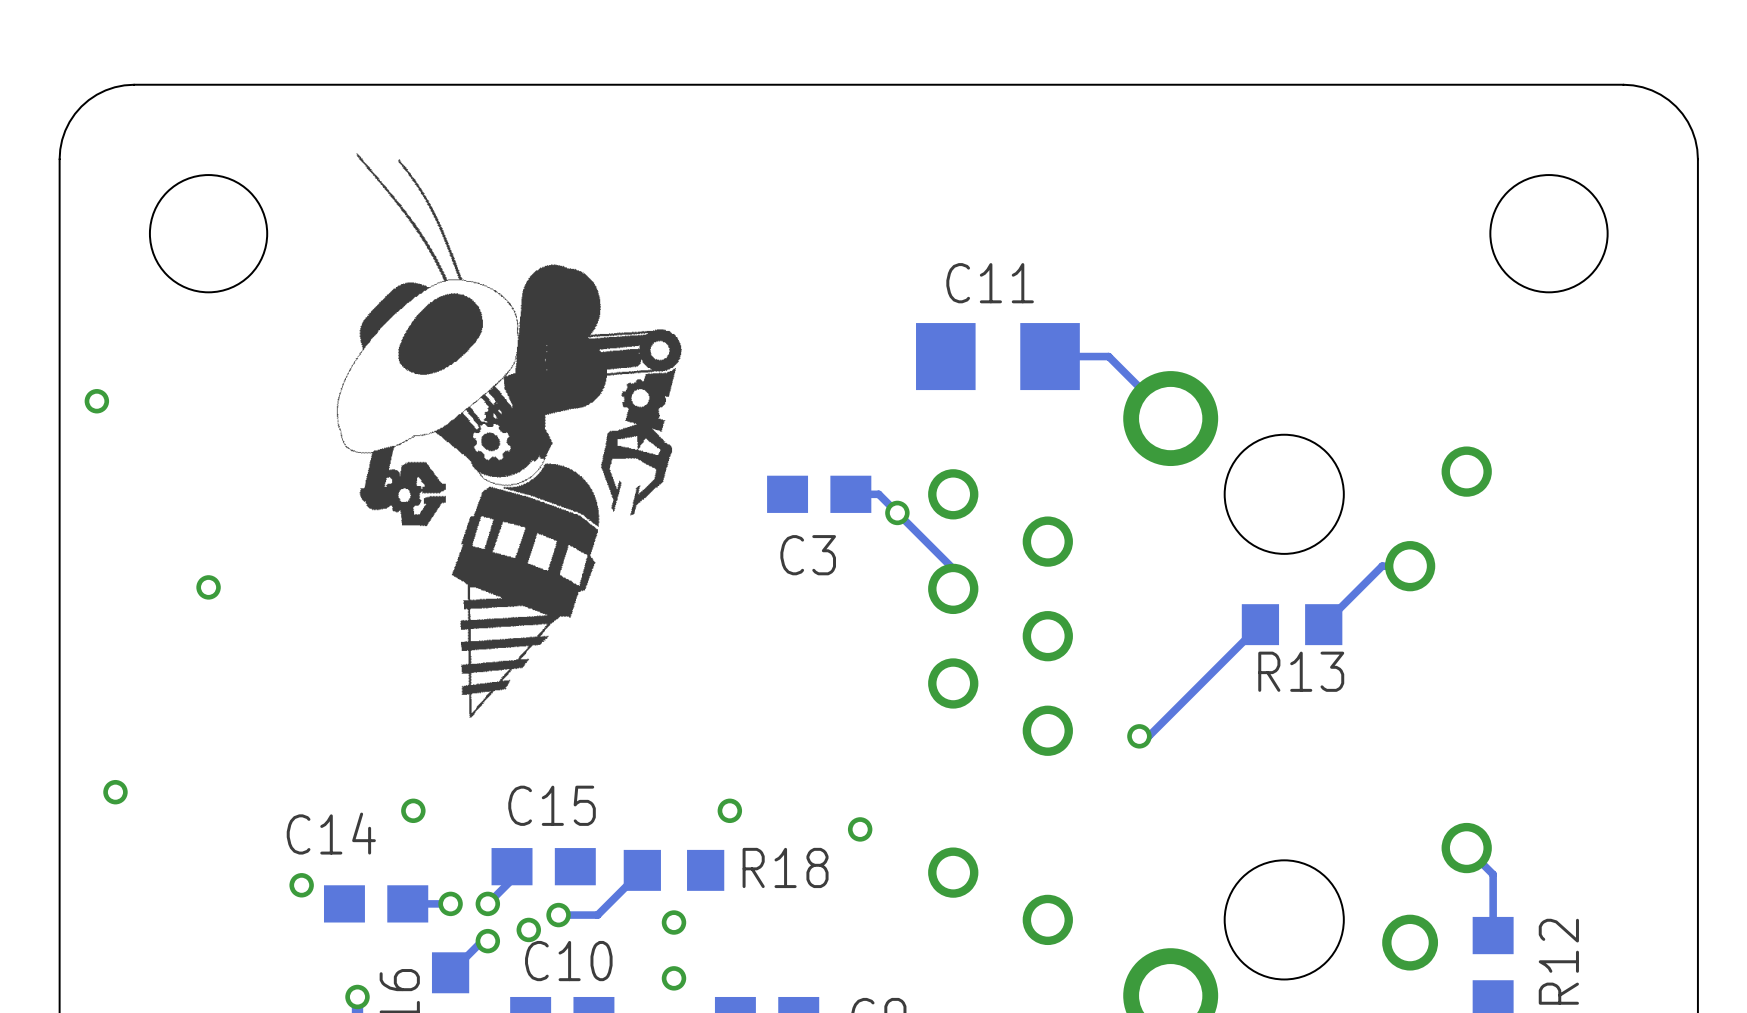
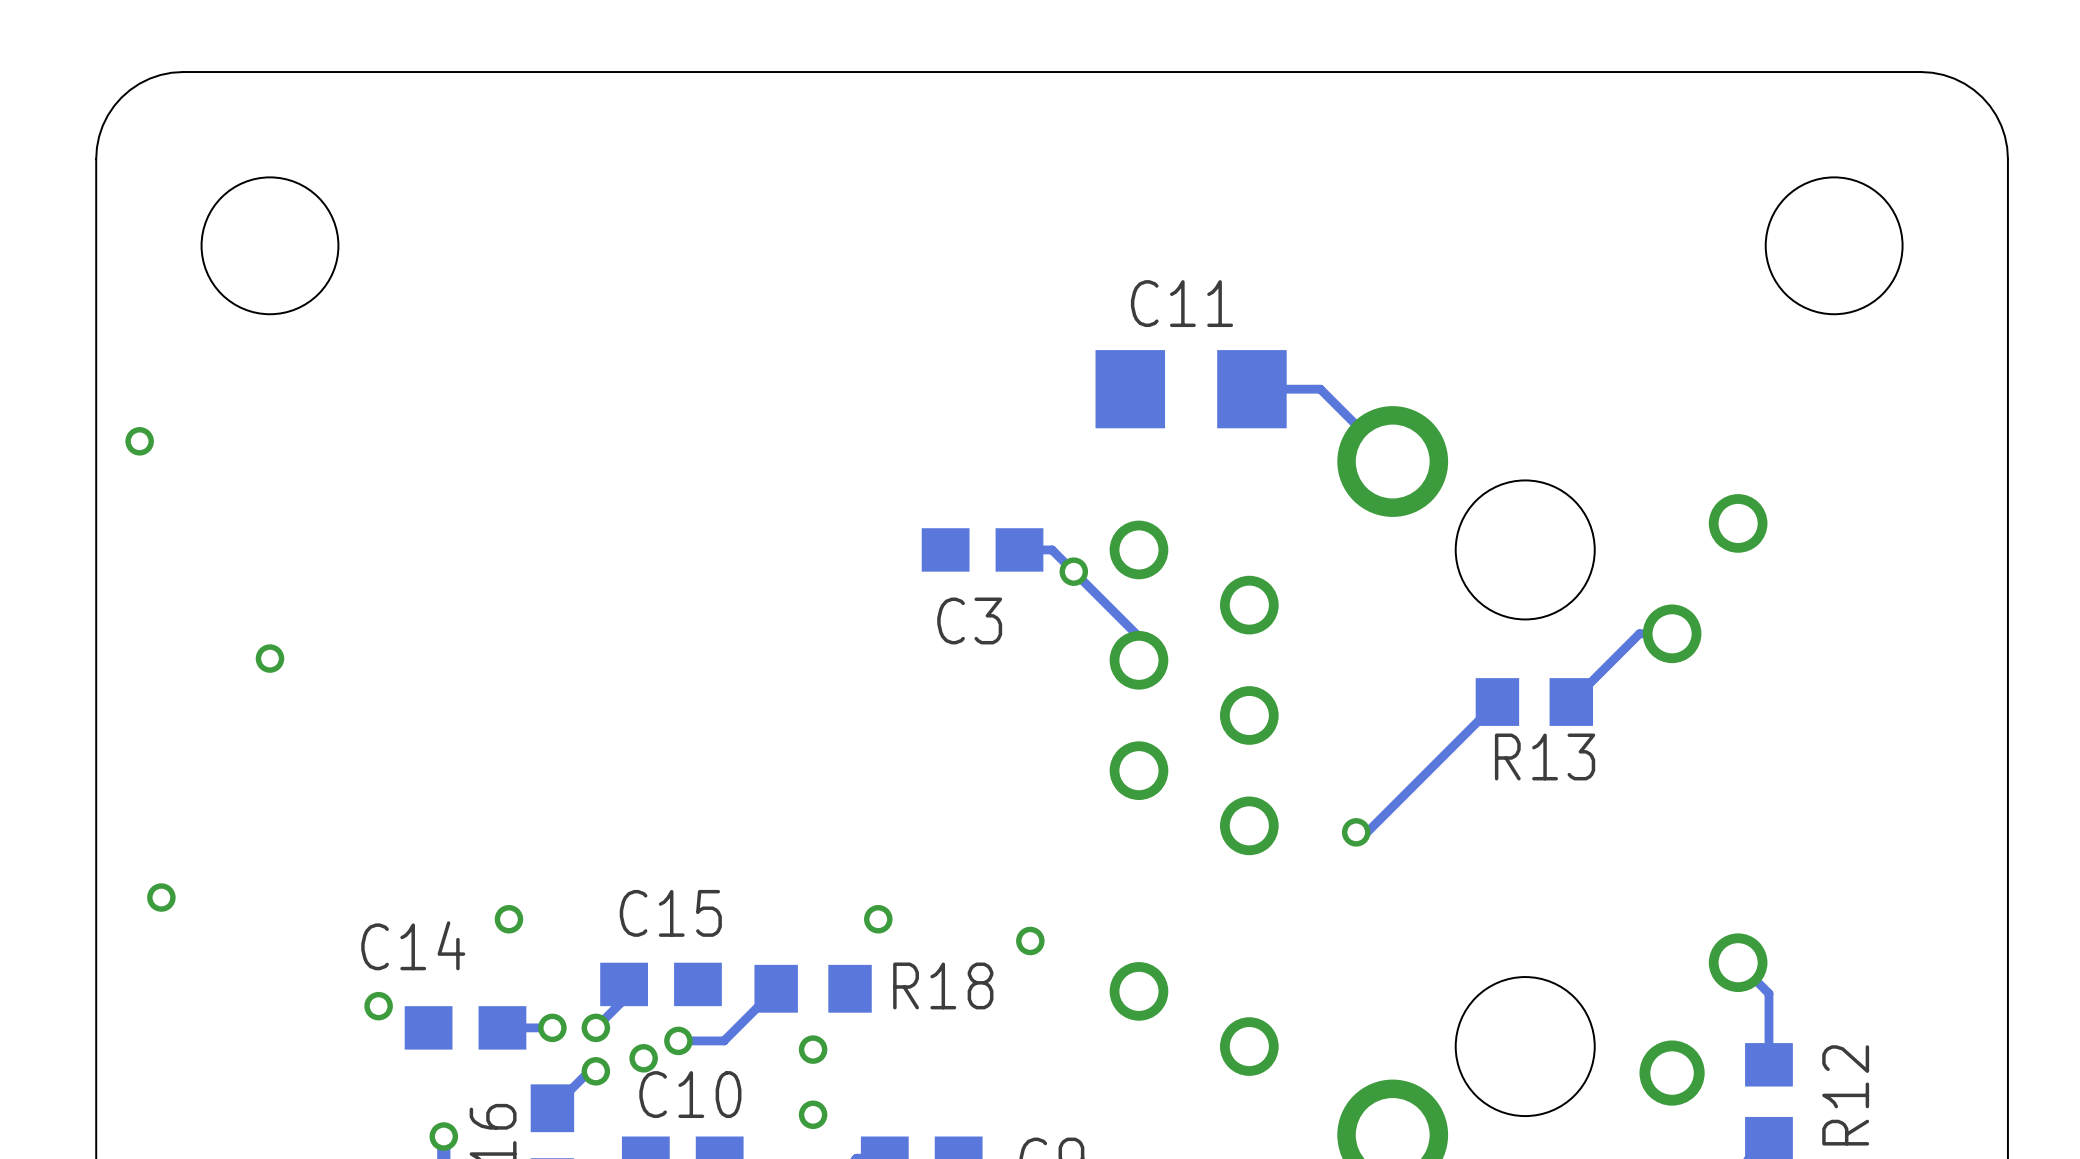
drawing: [336, 153, 682, 718] -> none

